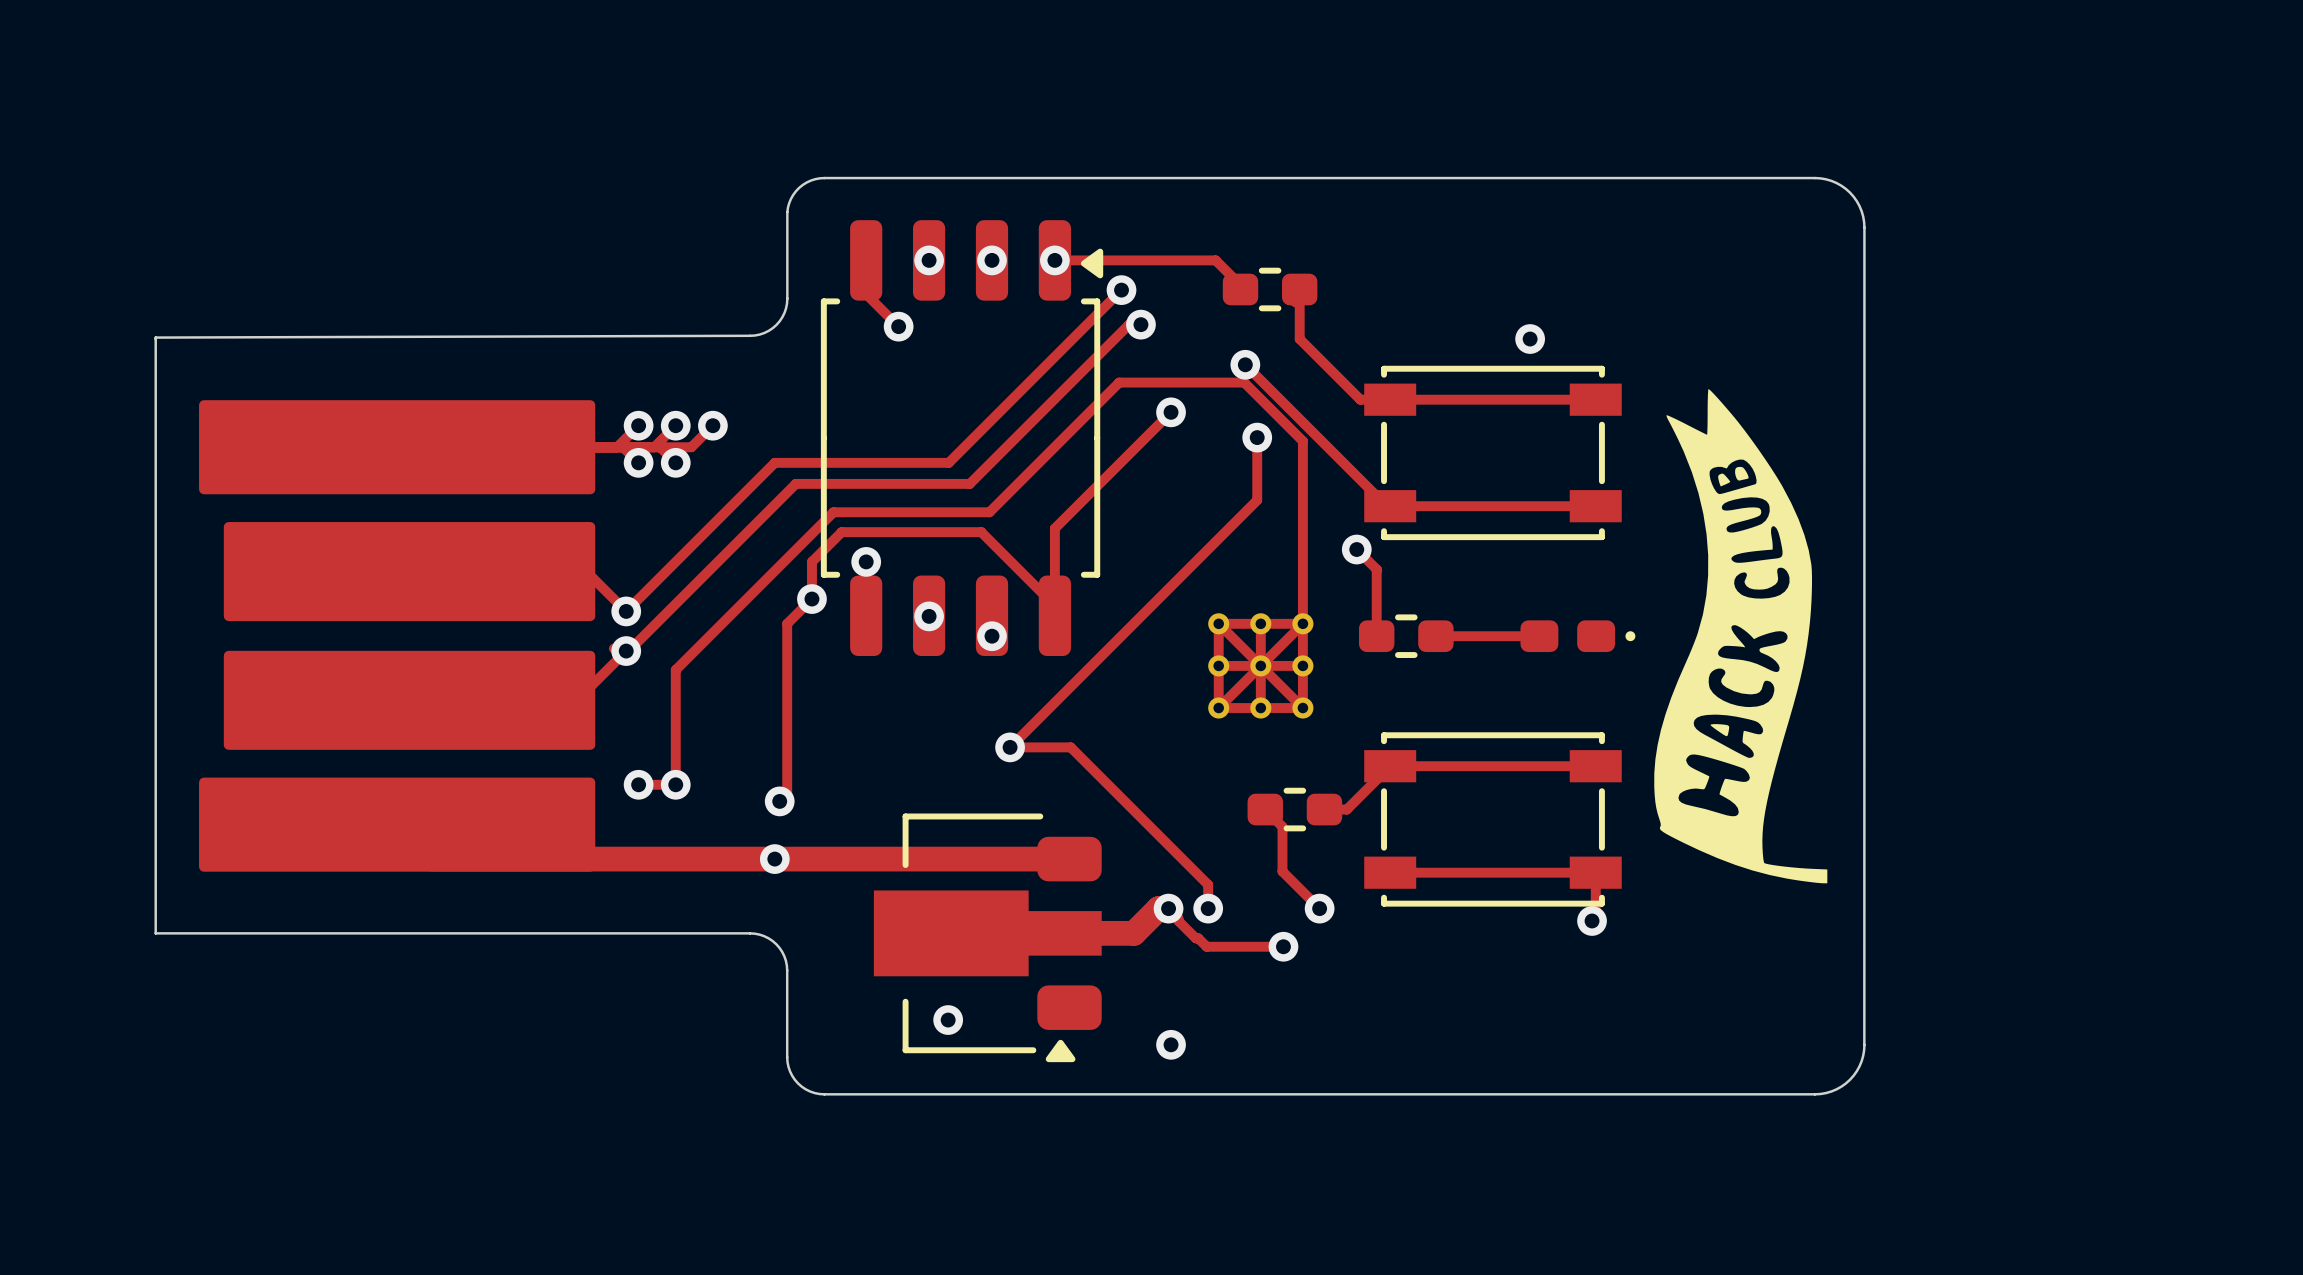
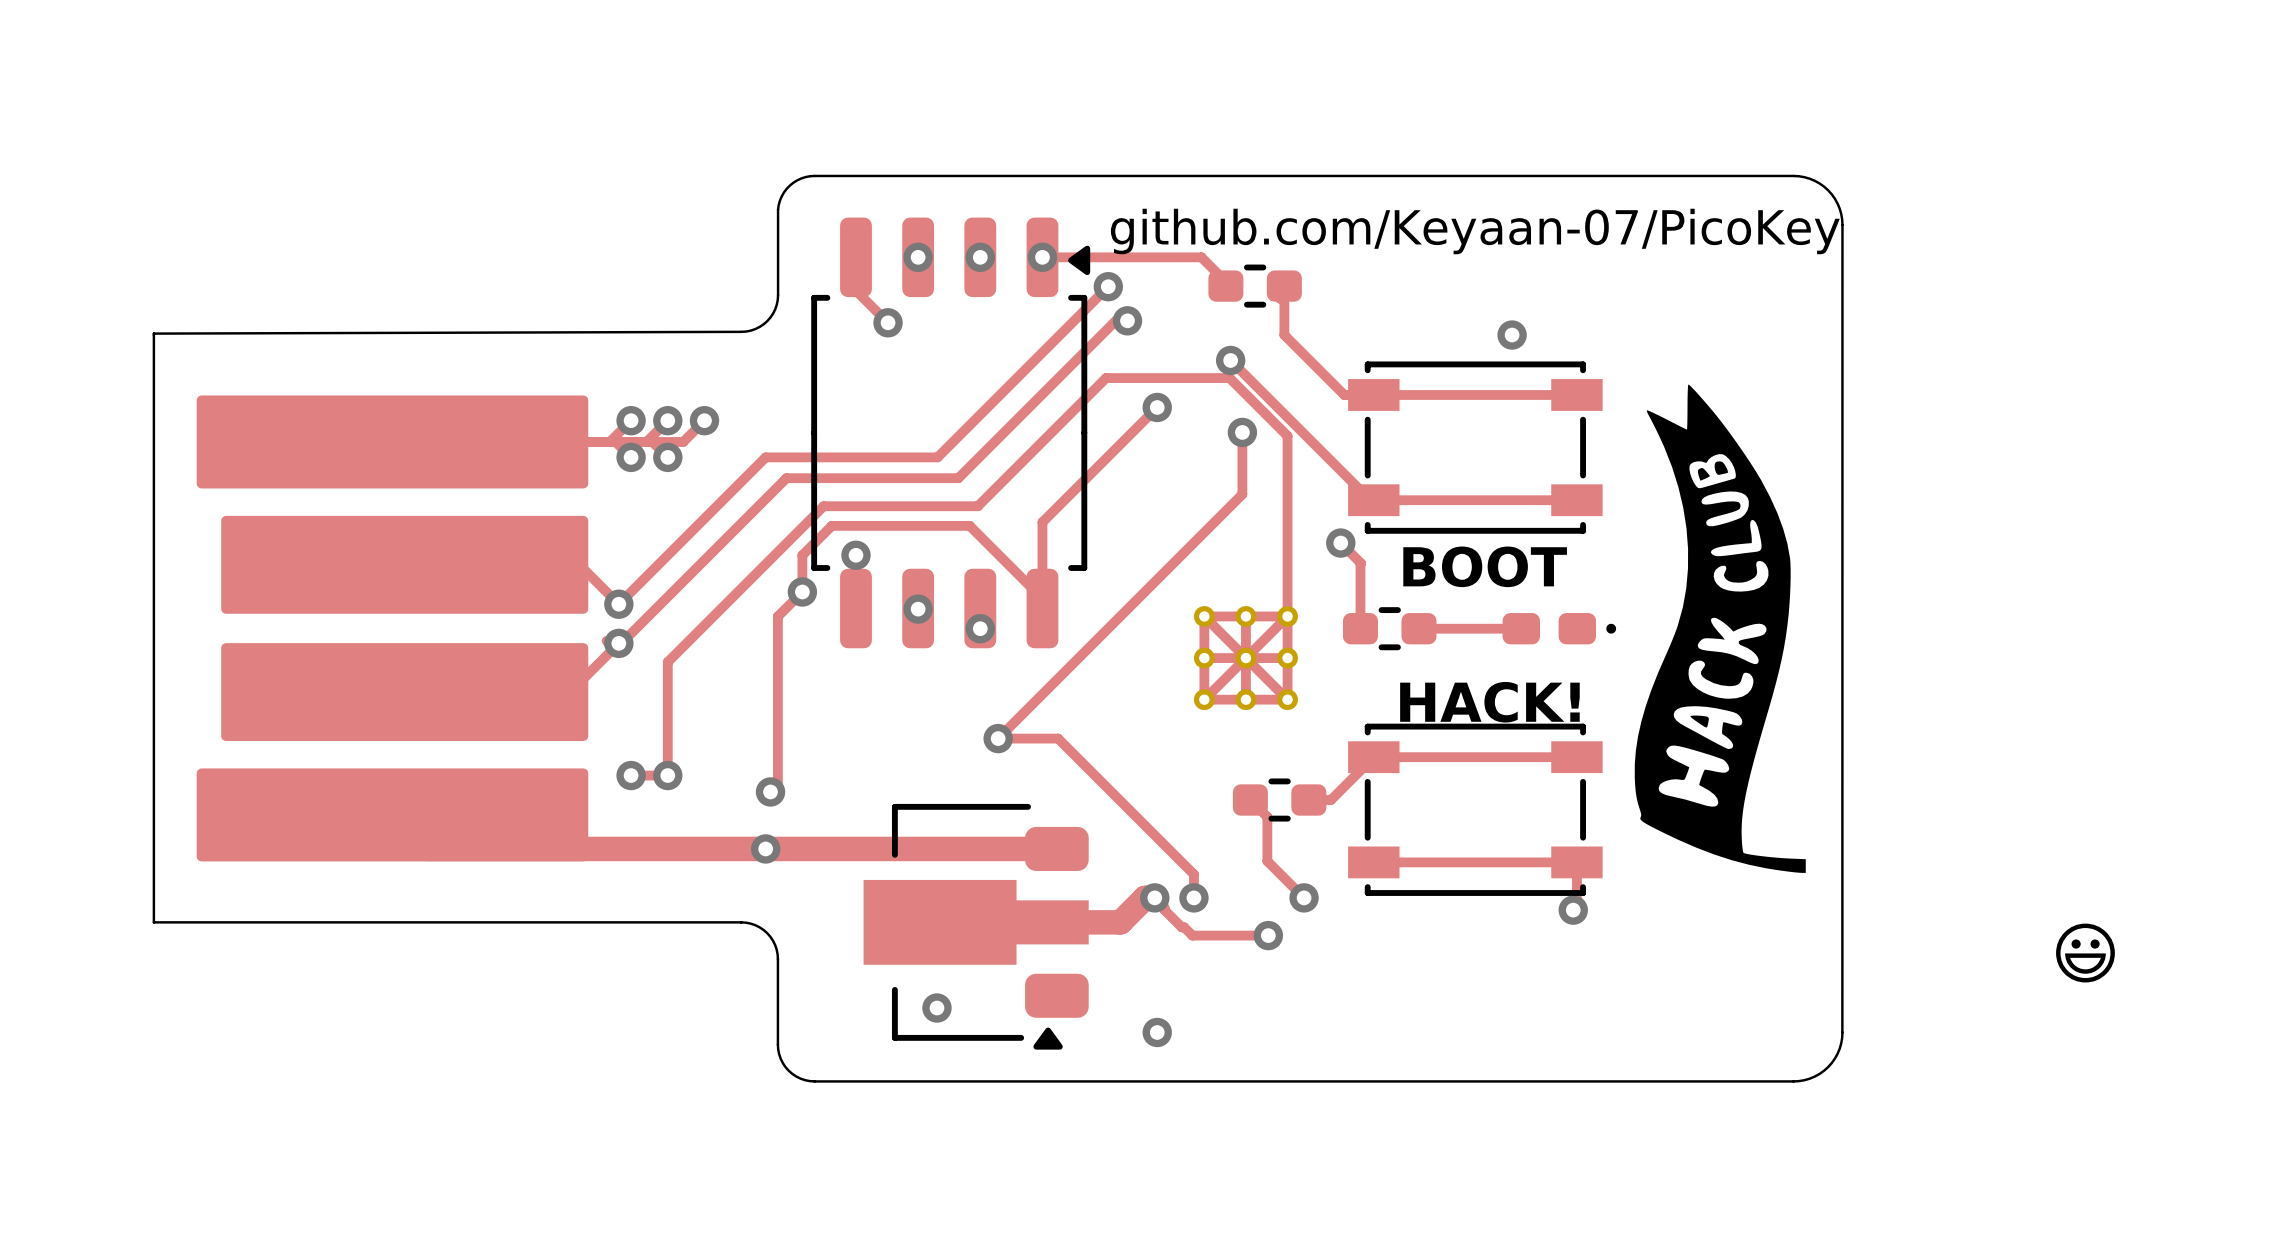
text: none -> github.com/Keyaan-07/PicoKey (1475, 231)
text: none -> BOOT (1485, 566)
text: none -> HACK! (1489, 702)
text: none -> 😃 (2085, 953)

